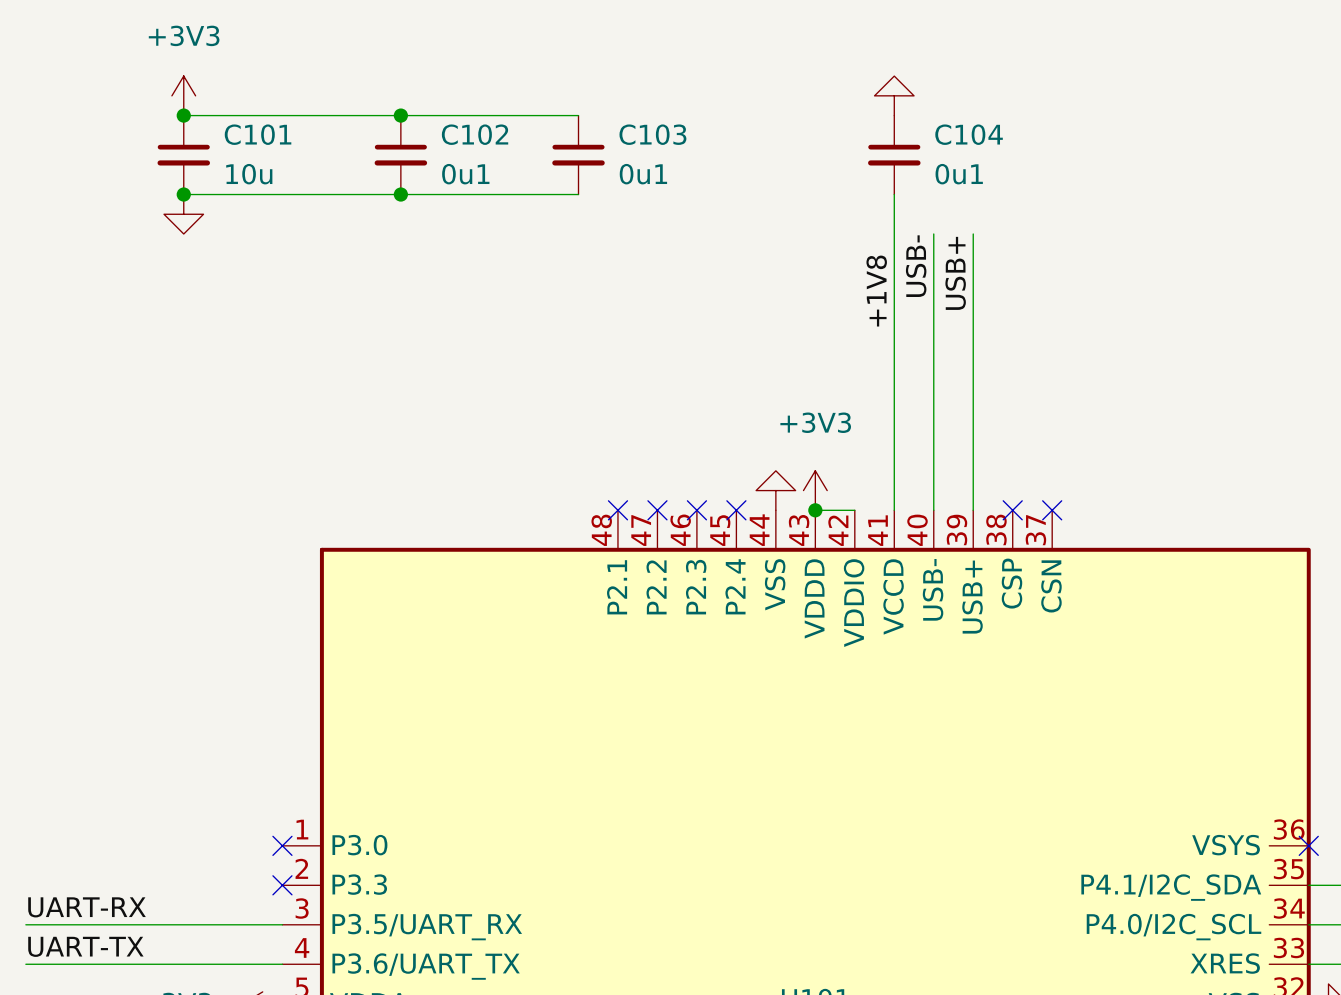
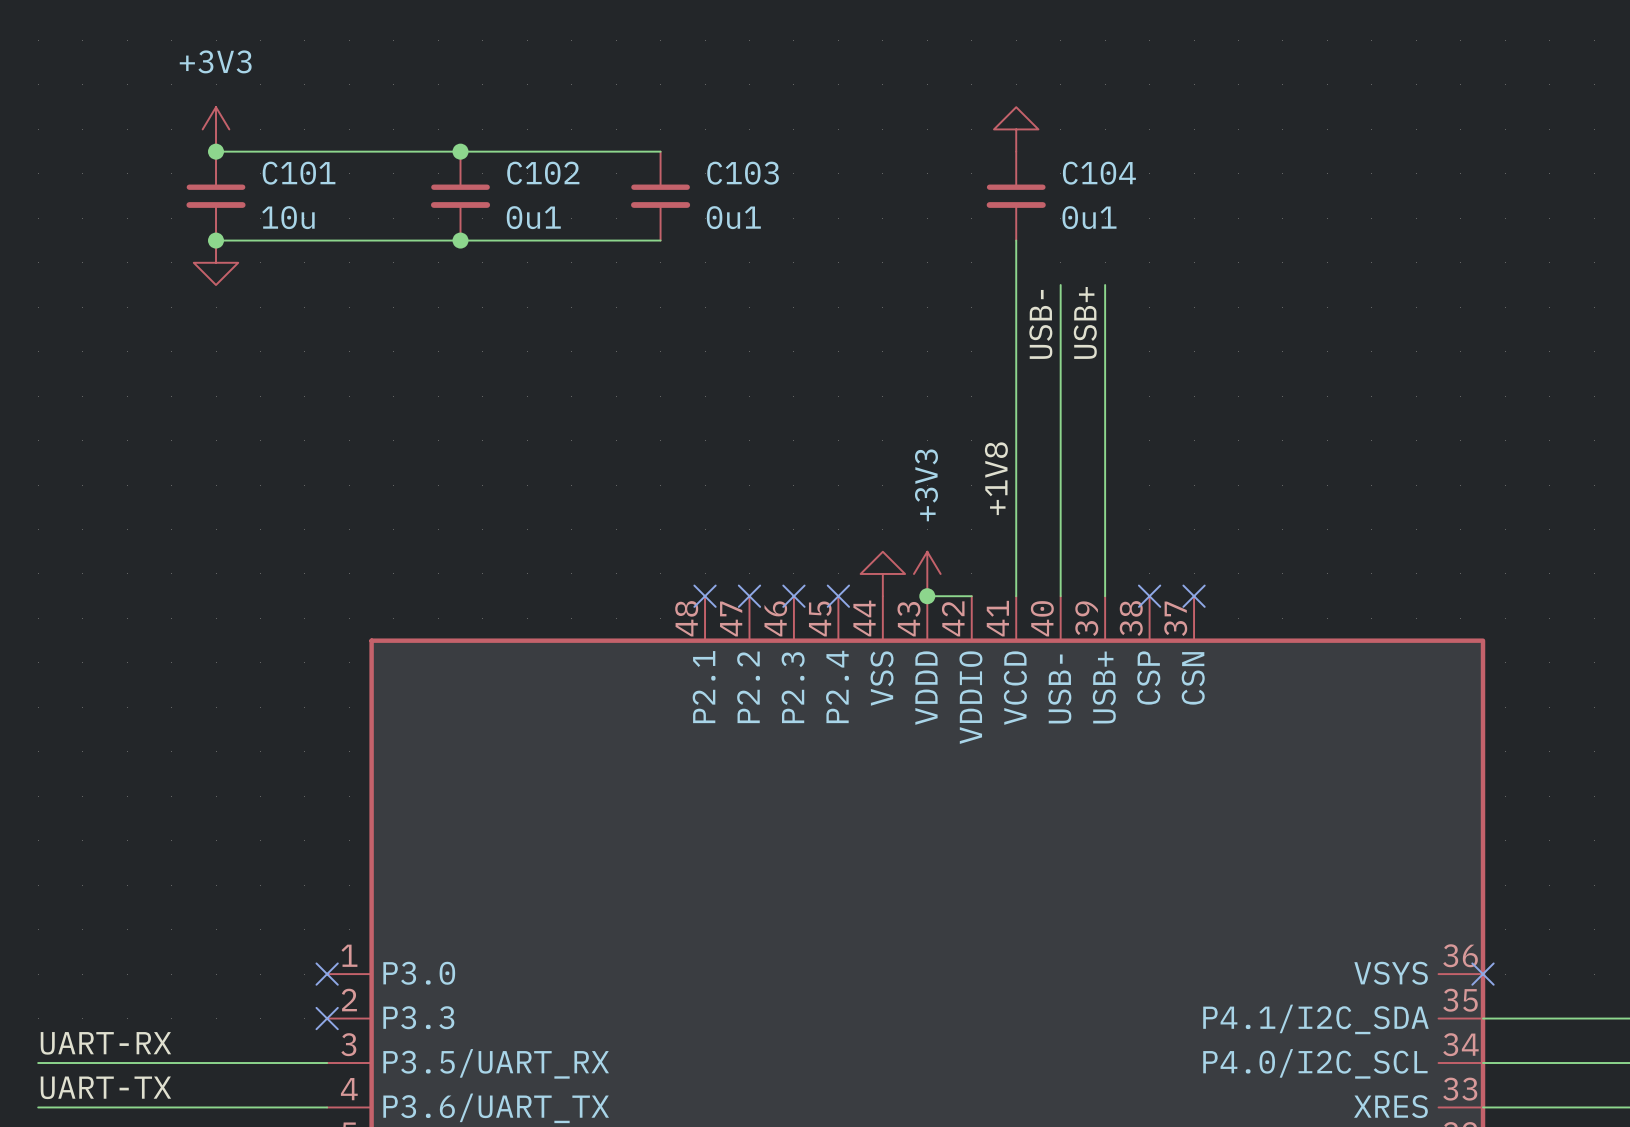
label position: +1V8 (876, 291) -> +1V8 (996, 478)
power symbol text rotation: 0° (815, 422) -> 90° counterclockwise (926, 485)

